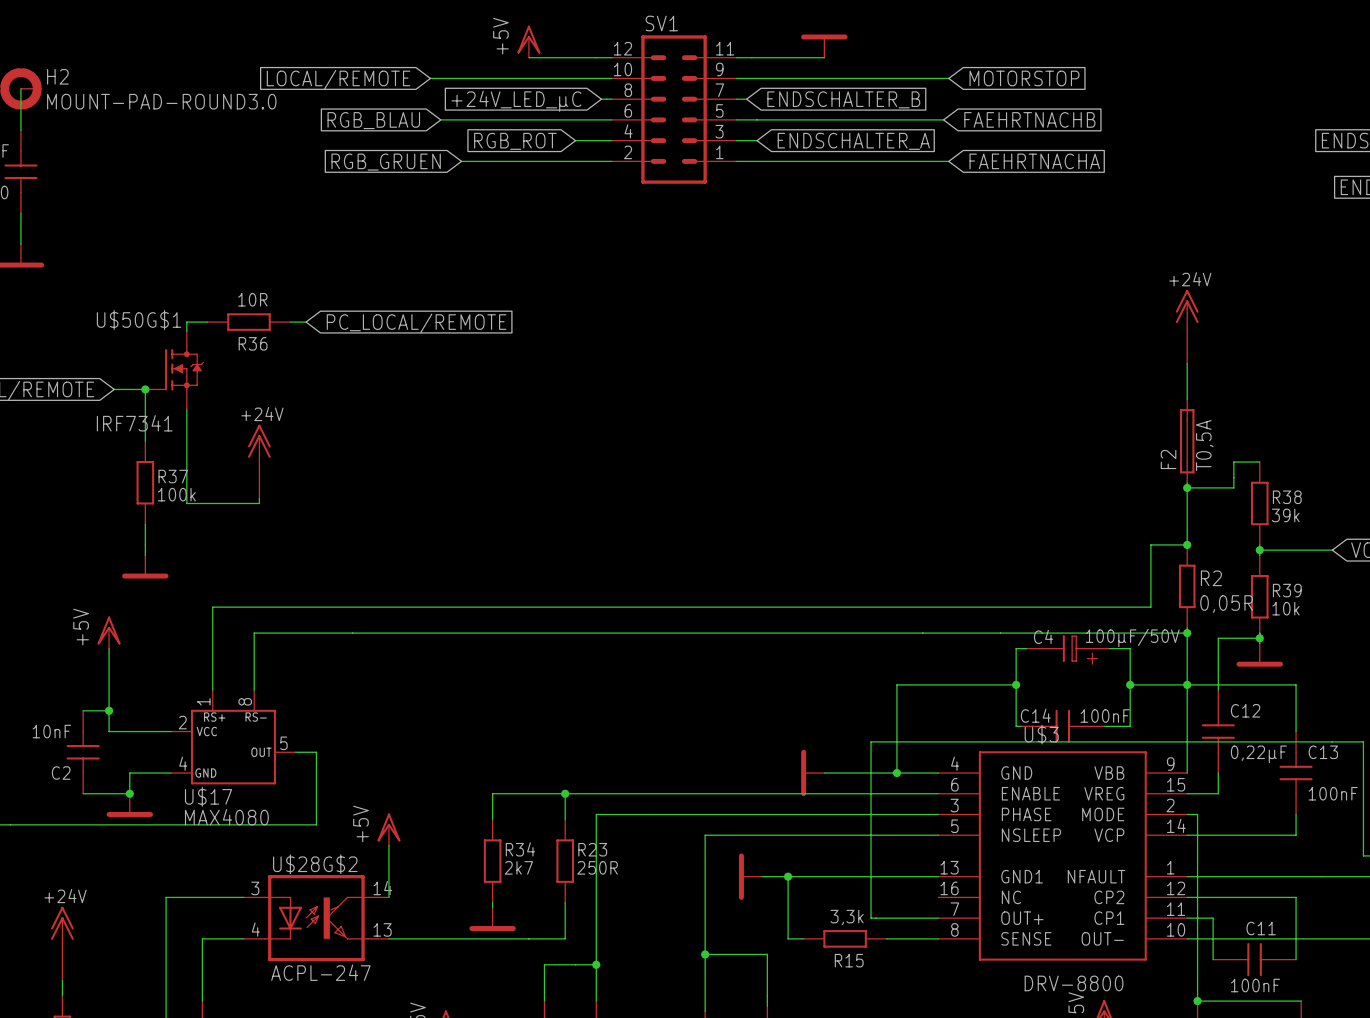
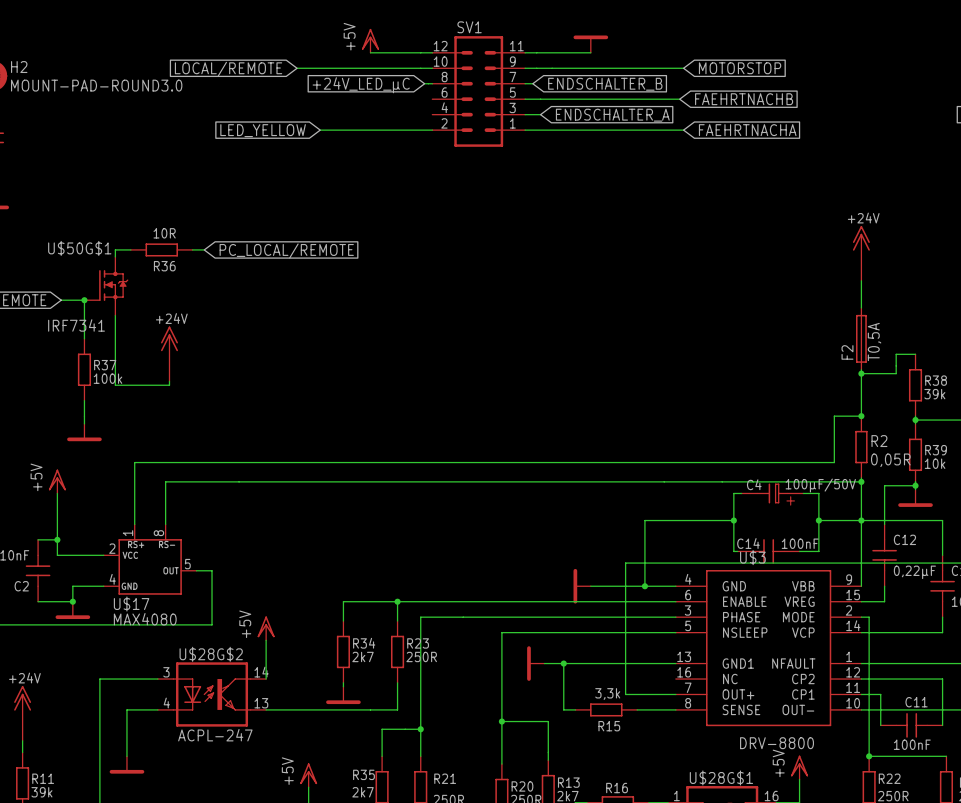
wire: (440, 119) (611, 119) -> none
global label: RGB_BLAU (373, 120) -> none
wire: (575, 140) (611, 140) -> none
global label: RGB_ROT (515, 141) -> none
global label: RGB_GRUEN (386, 162) -> LED_YELLOW (263, 130)

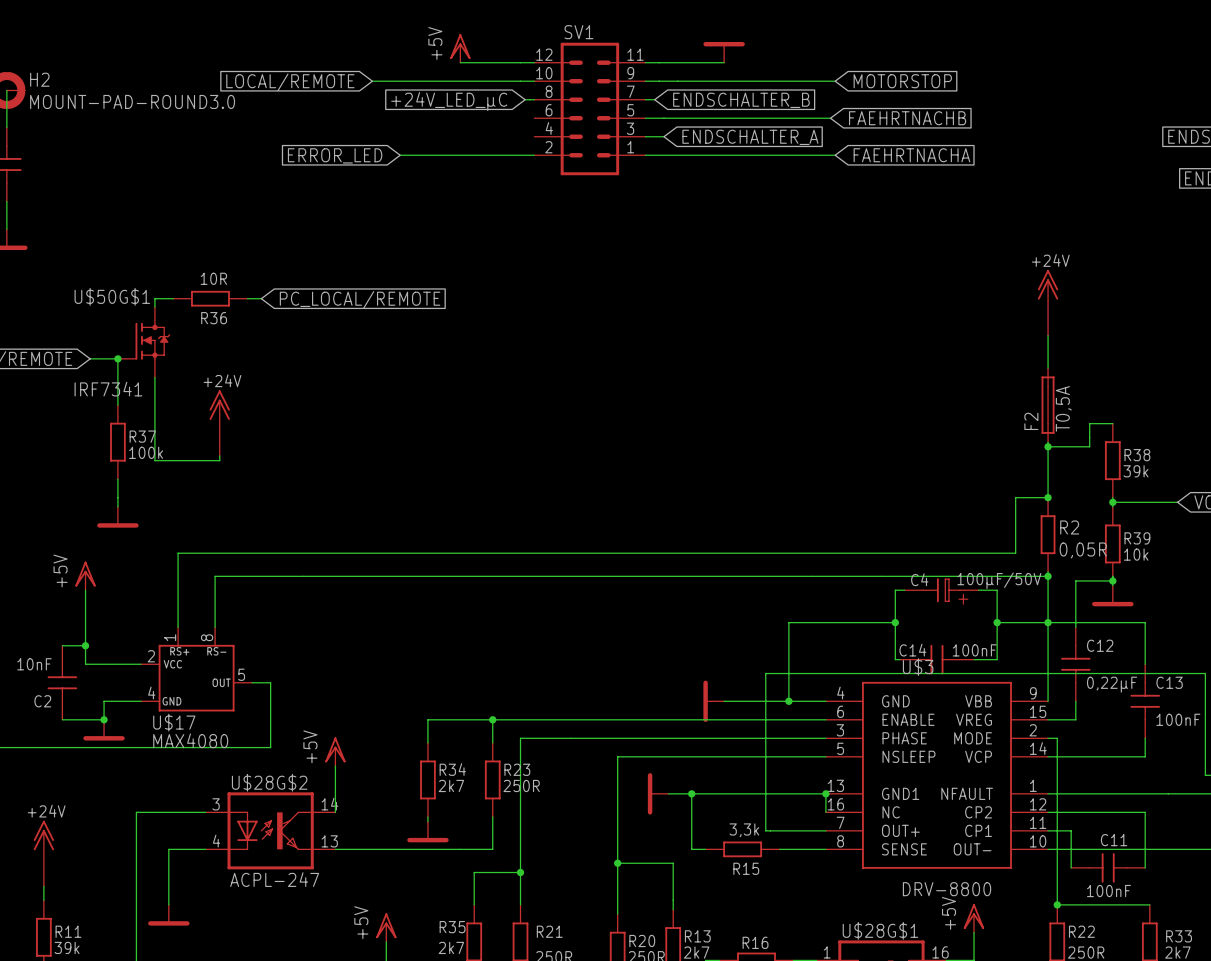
global label: LED_YELLOW (263, 130) -> ERROR_LED (335, 155)
wire: none -> (825, 793) (825, 812)
junction: none -> (825, 793)

